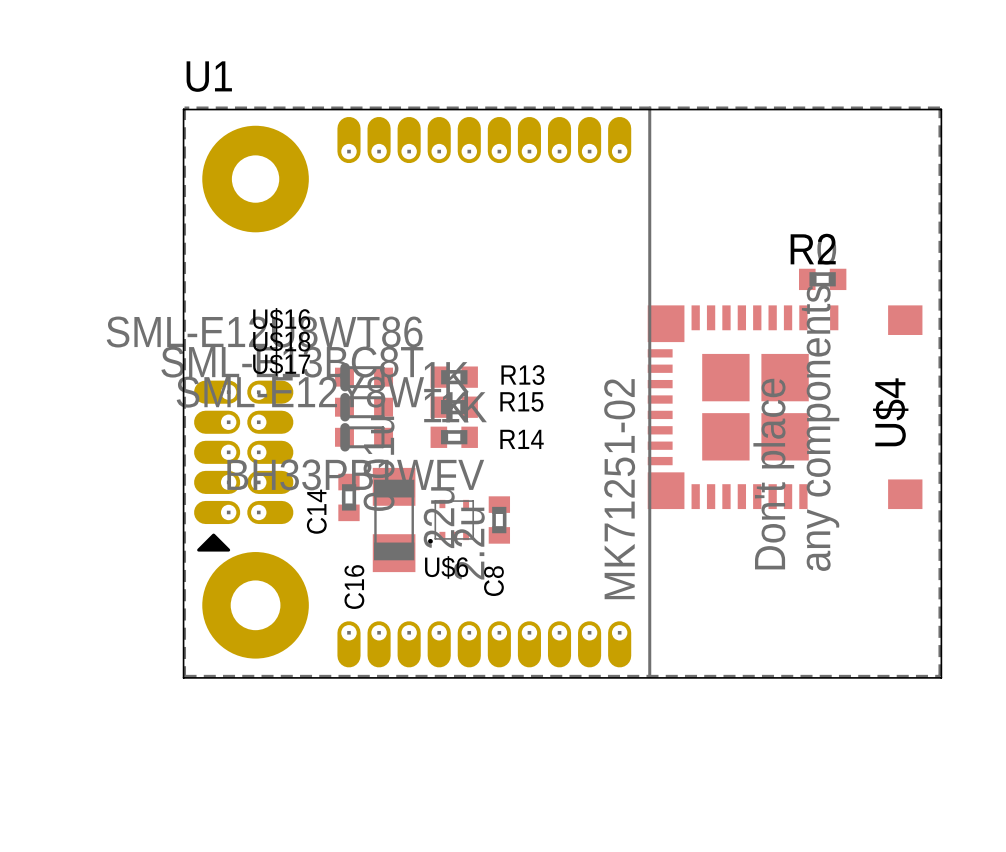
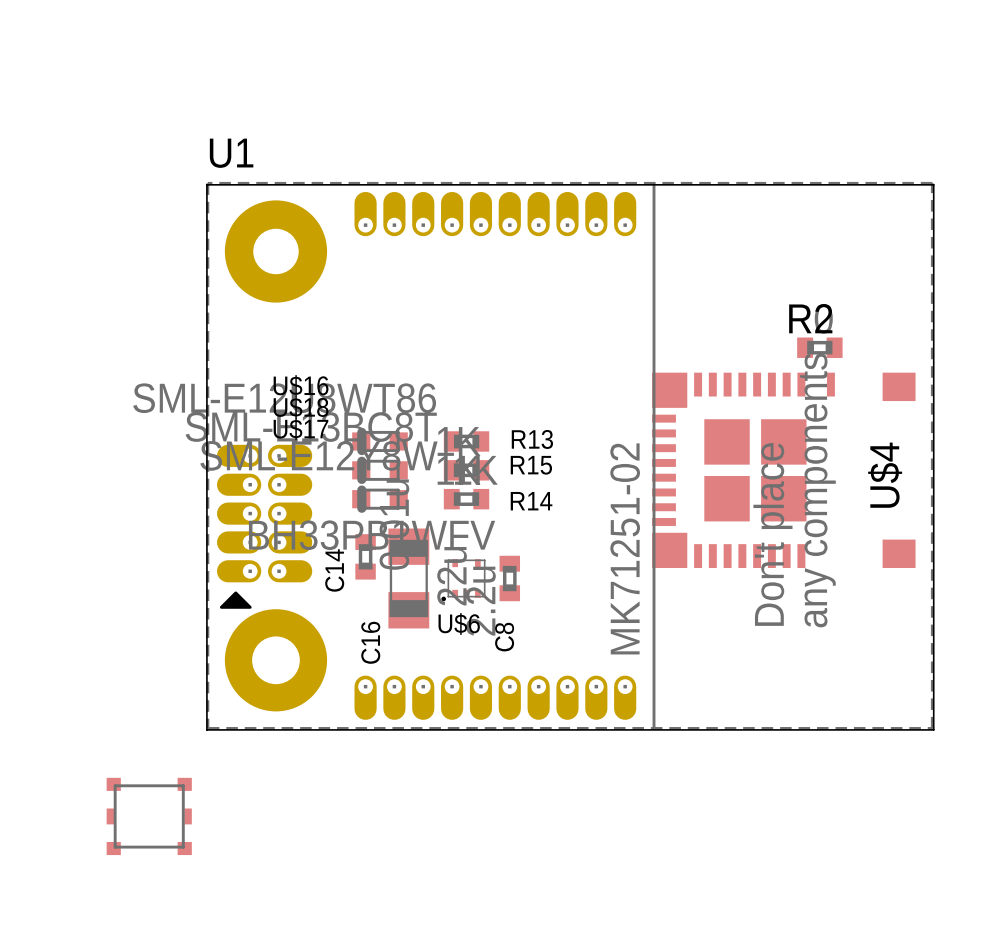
part: none -> (149, 816)

